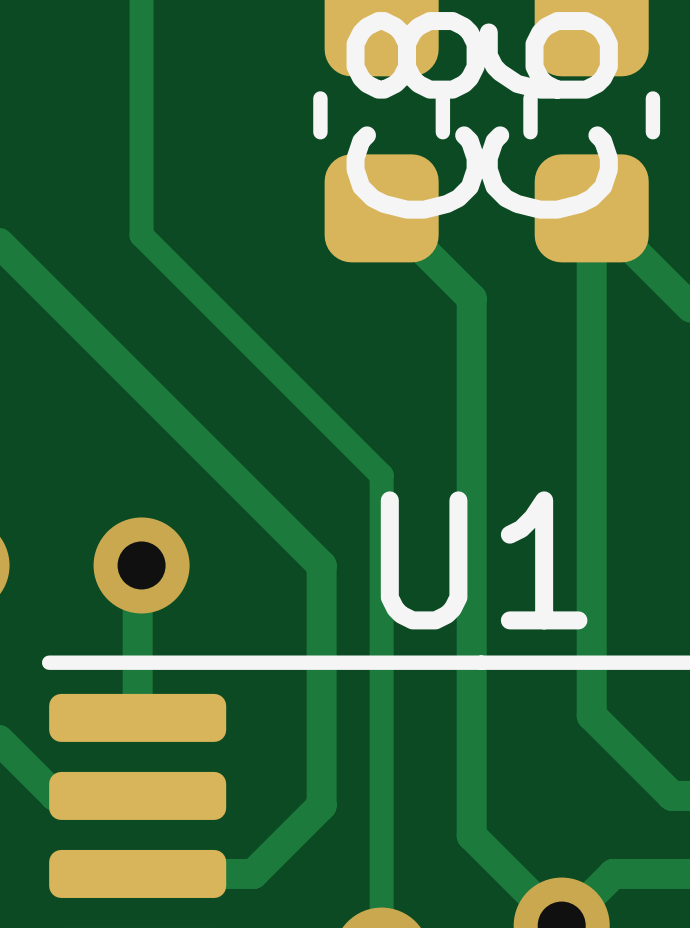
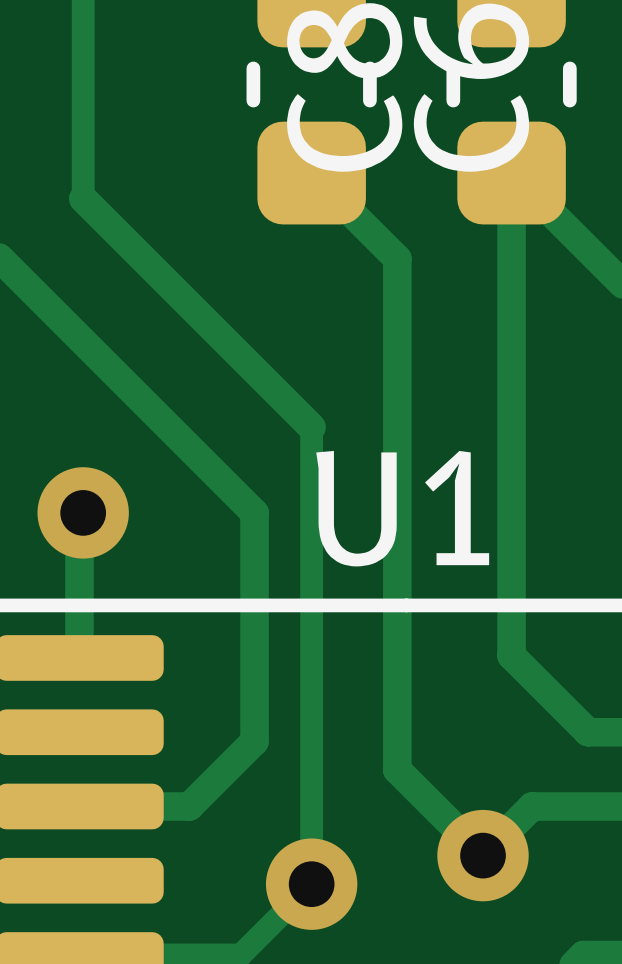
track width: thin (141, 235) (381, 475) -> thick (83, 198) (311, 427)

